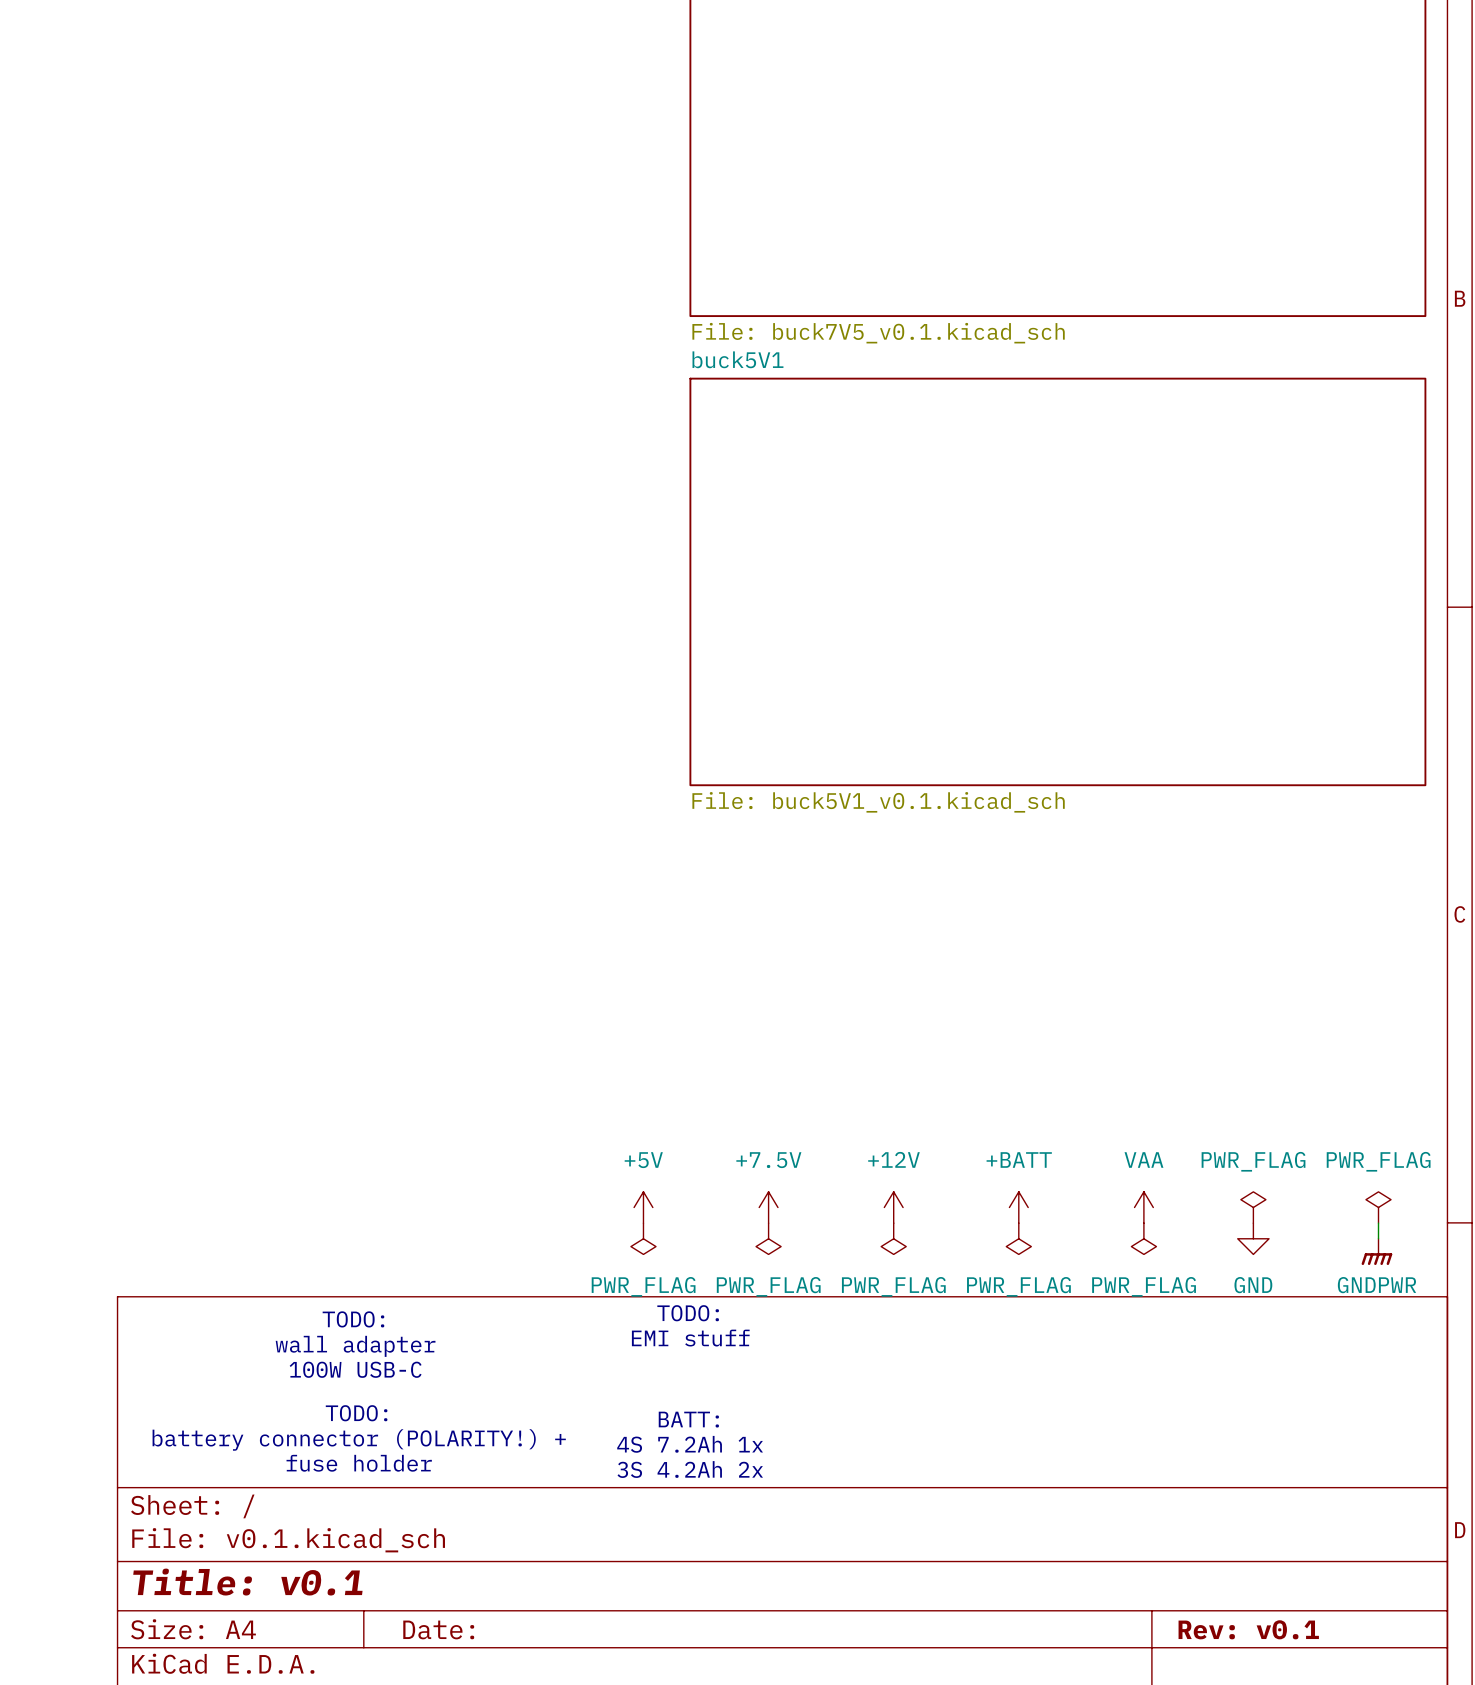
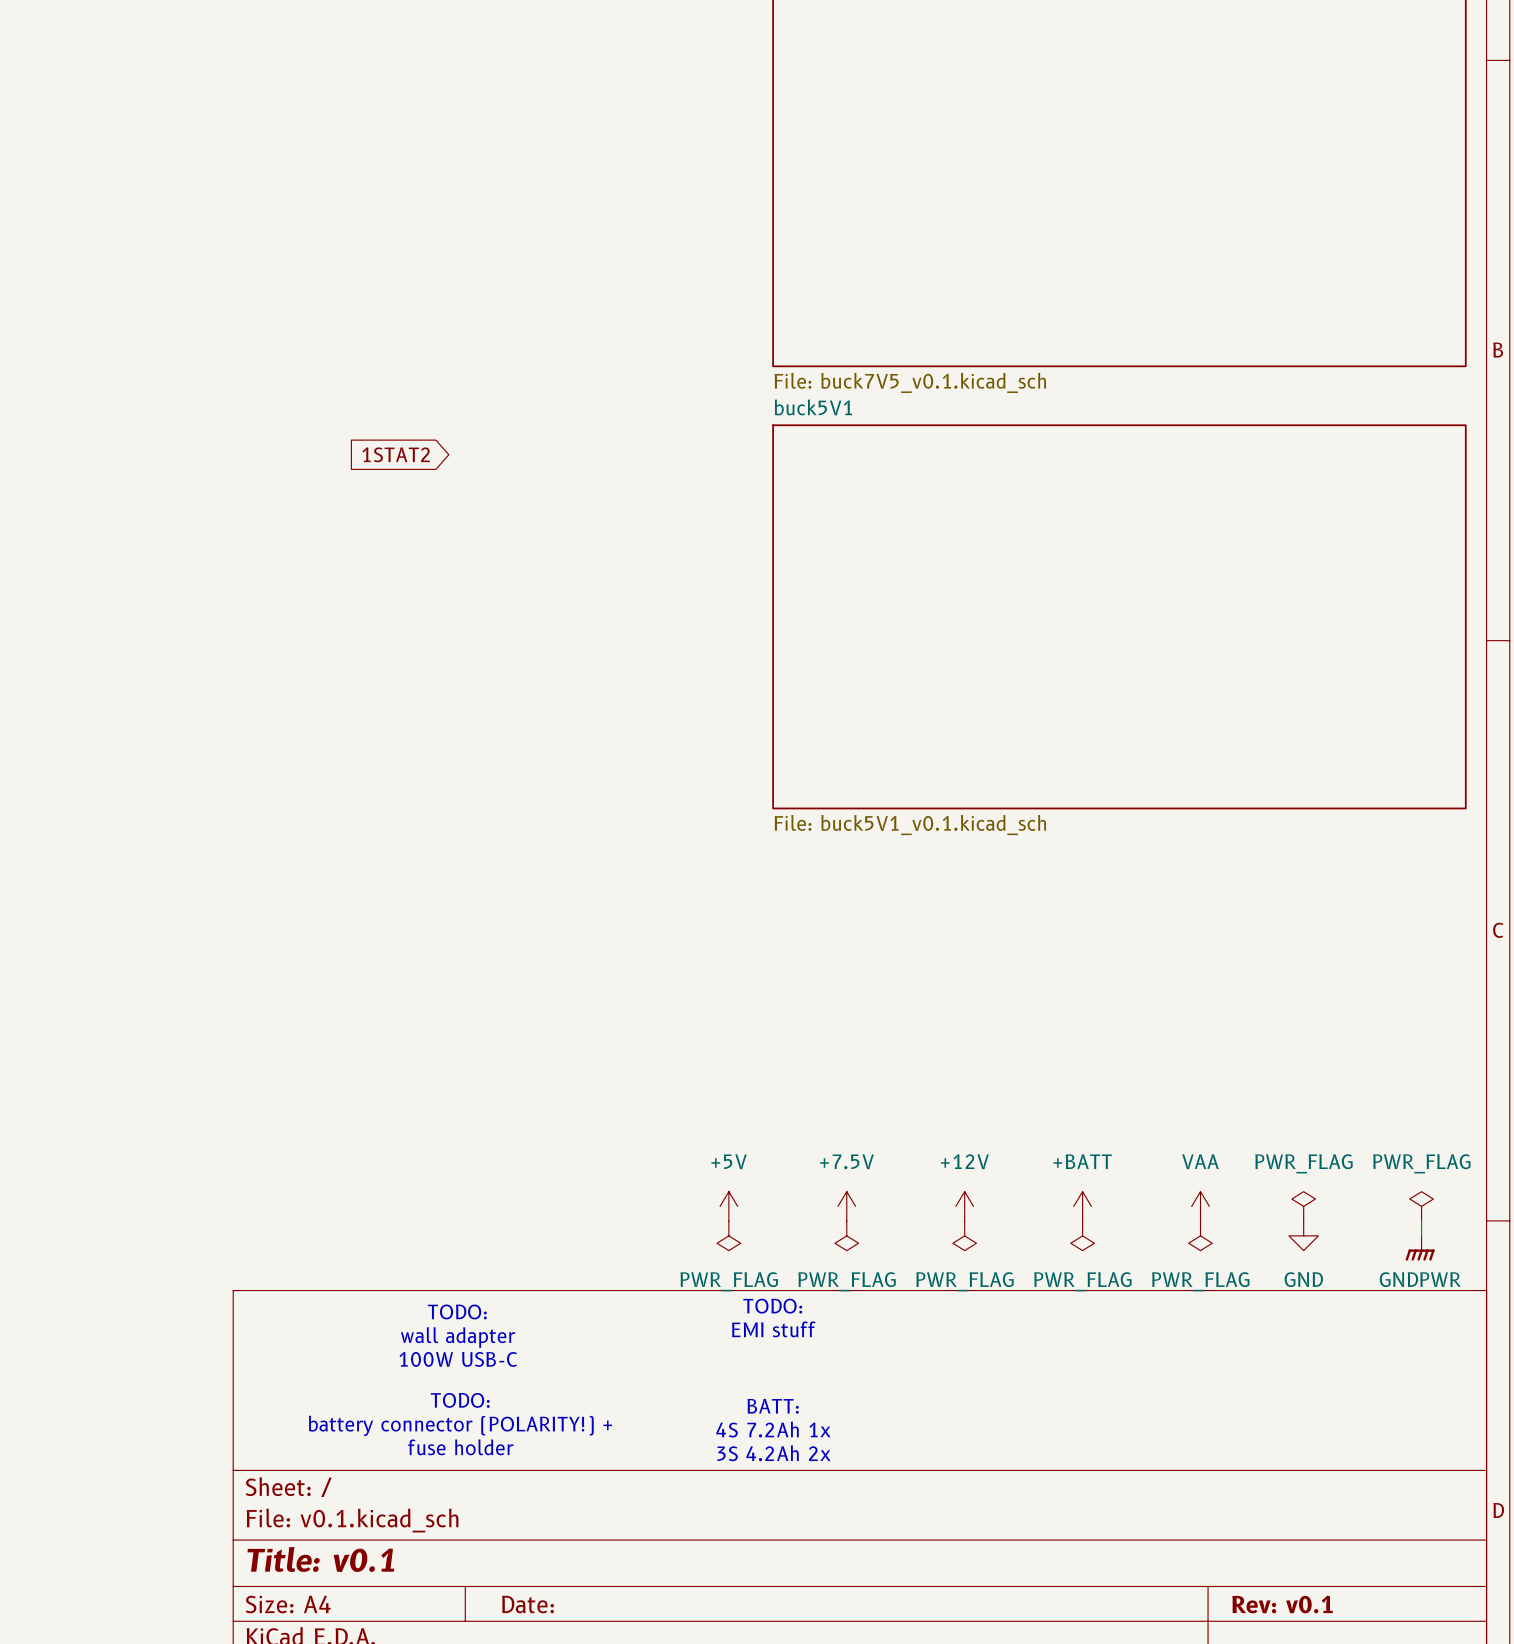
global label: none -> 1STAT2 (396, 454)

